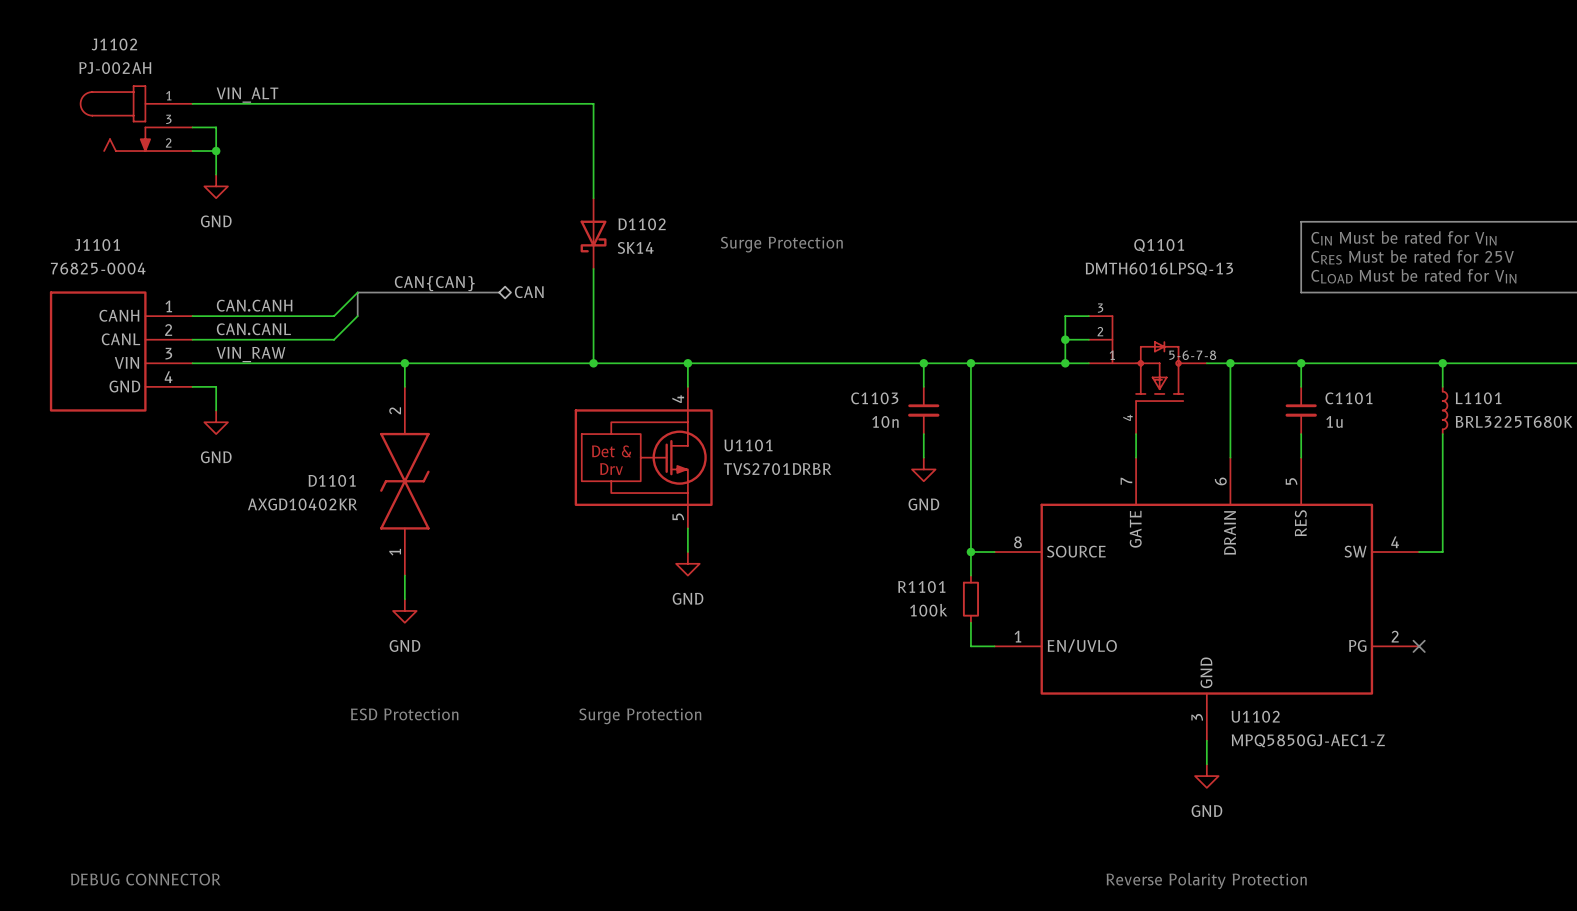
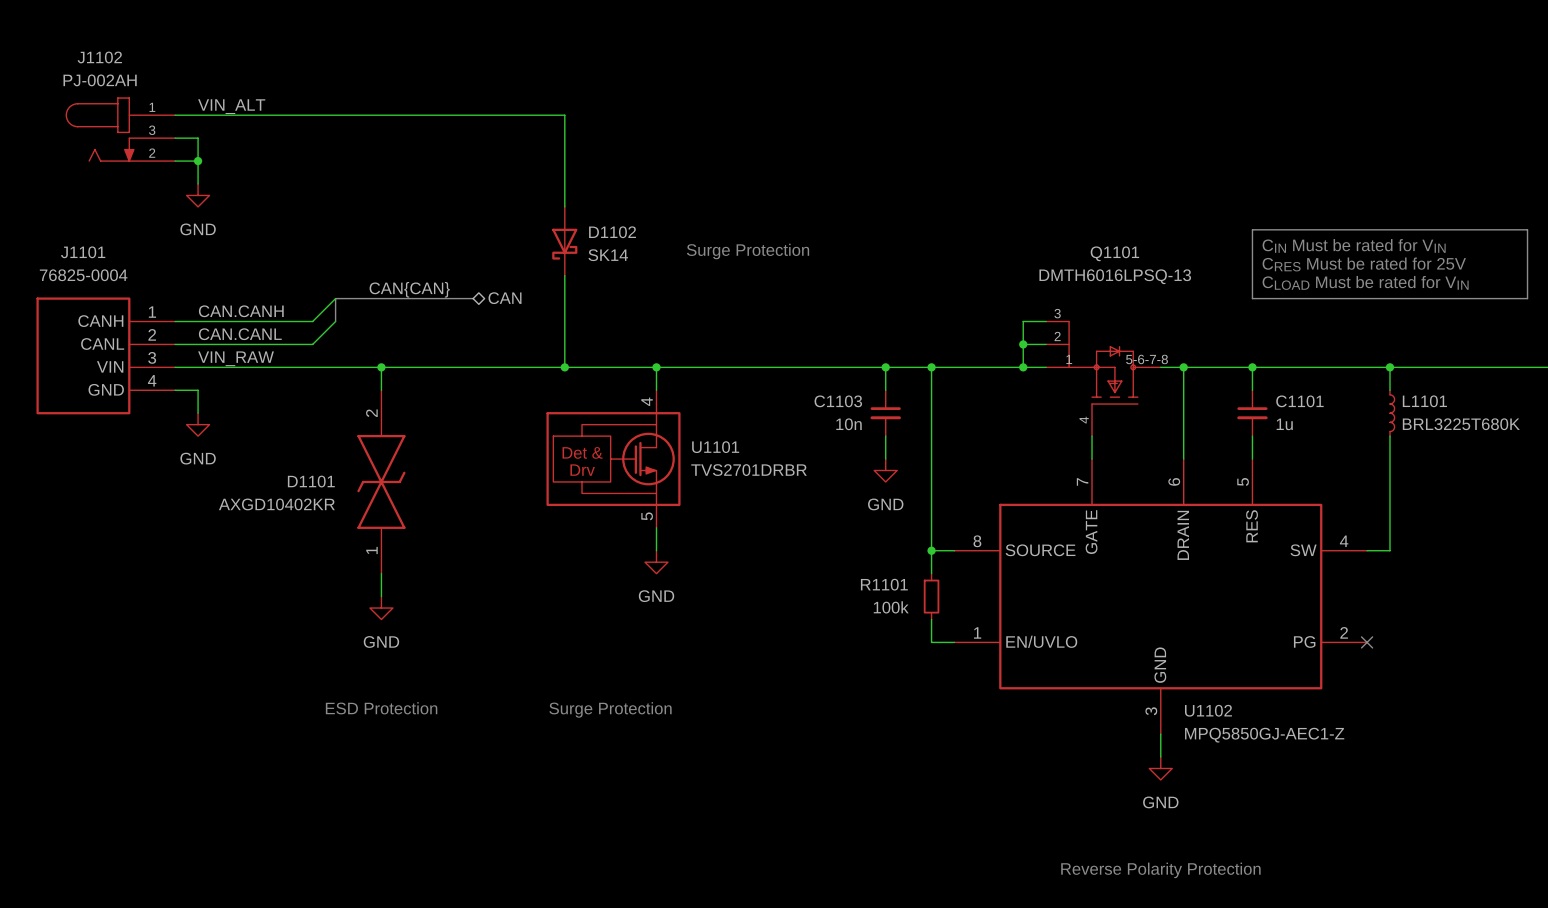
text: DEBUG CONNECTOR (145, 879) -> none

